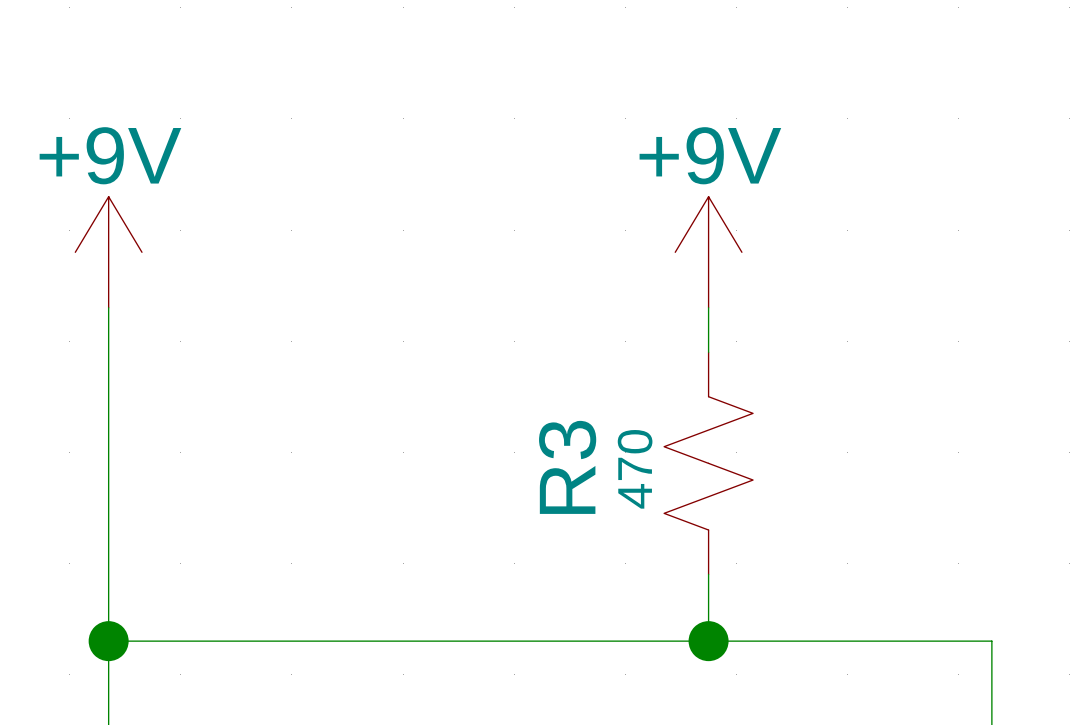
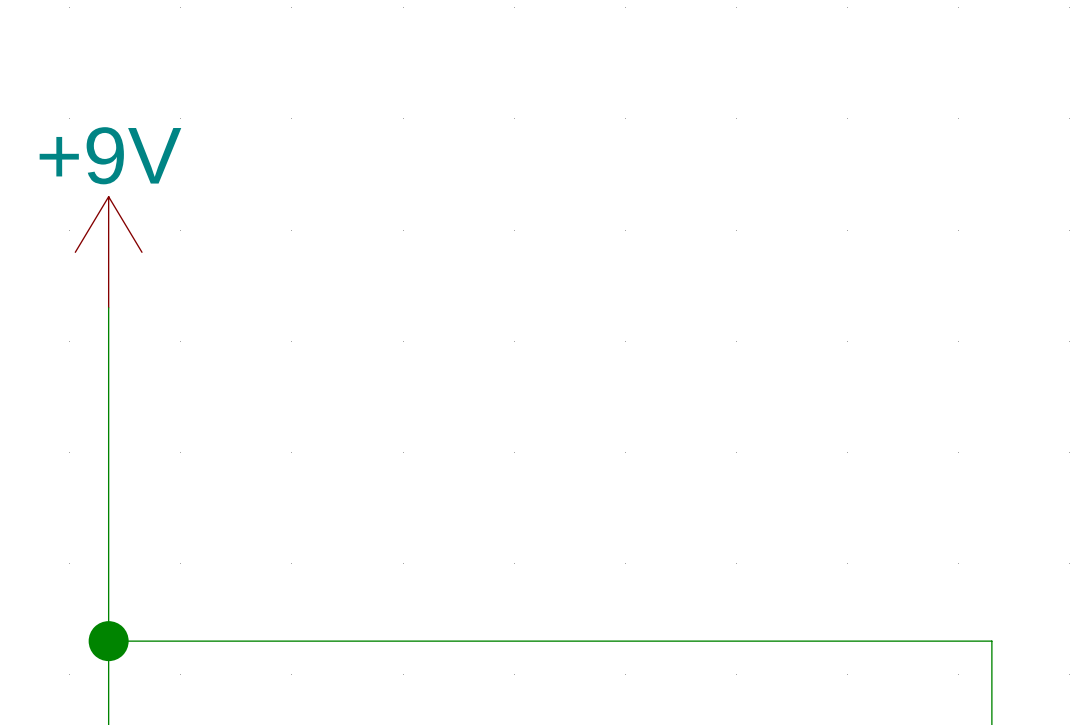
power symbol: +9V (708, 252) -> none
wire: (708, 307) (708, 352) -> none
R3: 470 (708, 463) -> none
wire: (708, 574) (708, 641) -> none
junction: (708, 641) -> none

